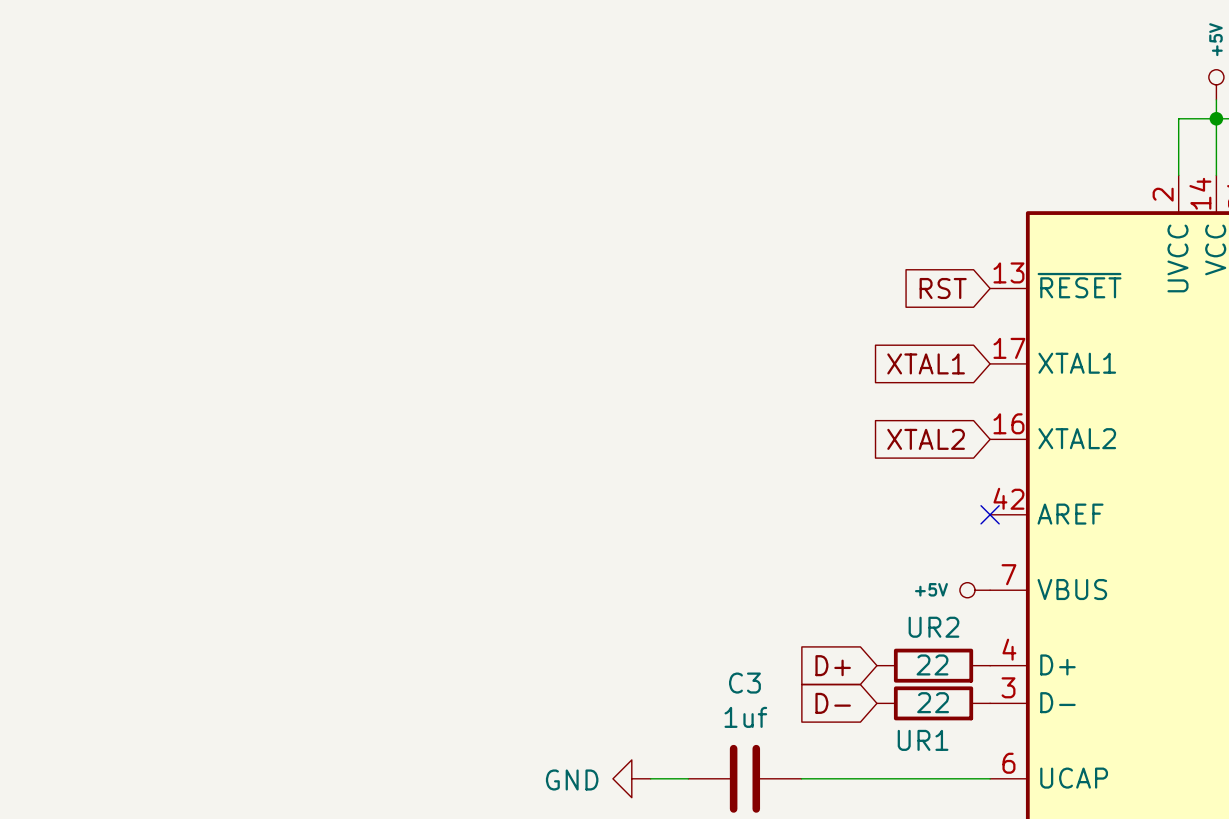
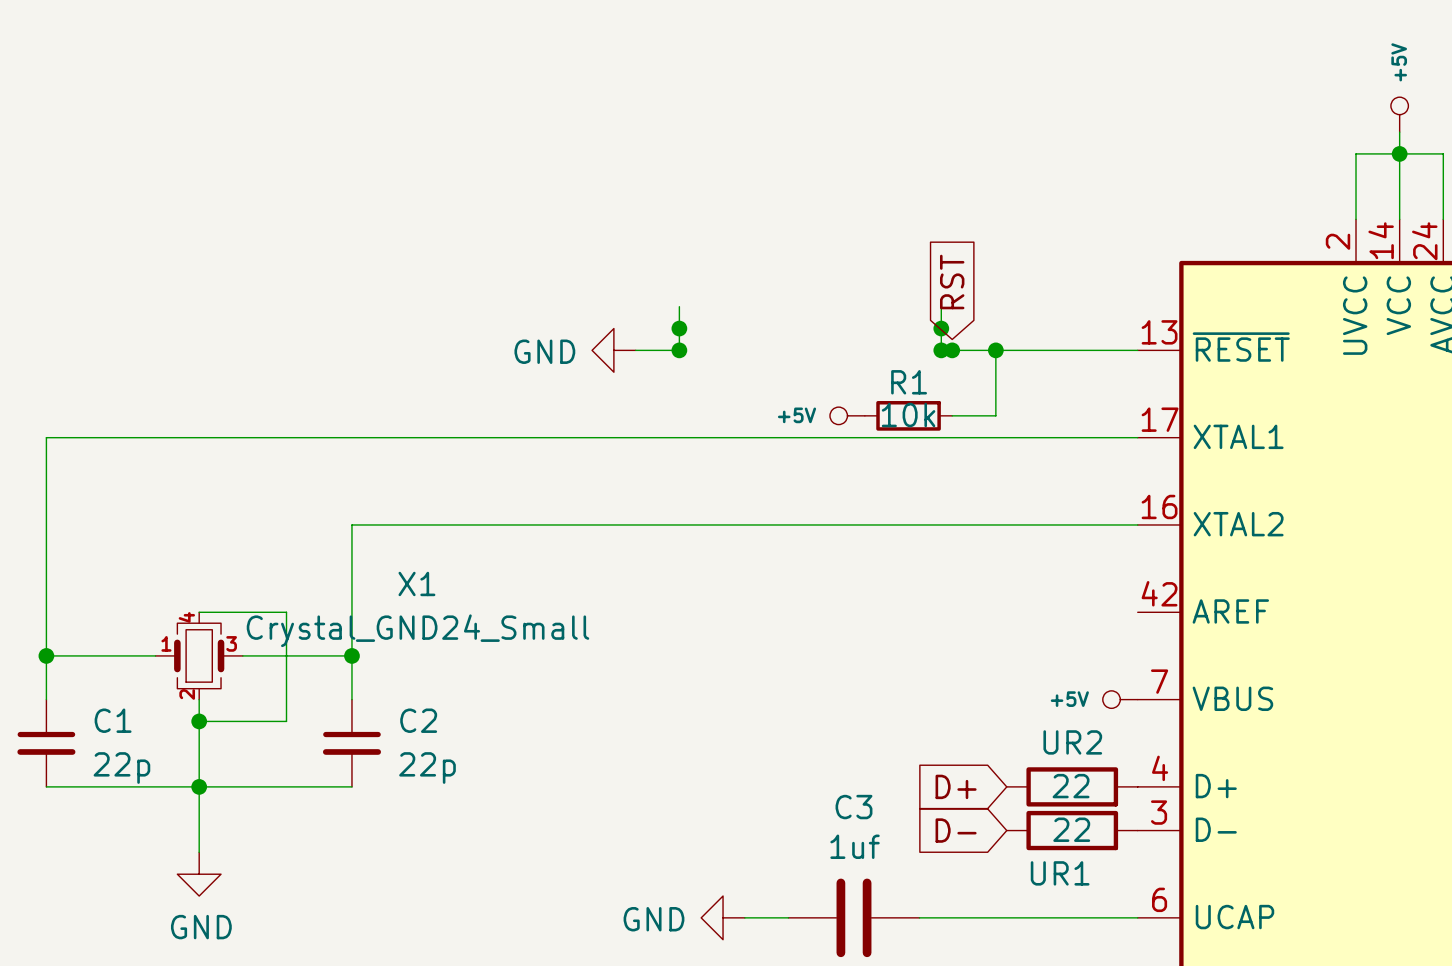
wire: none -> (679, 306) (679, 350) (635, 350)
wire: none -> (941, 306) (941, 350) (1137, 350)
junction: none -> (679, 328)
junction: none -> (941, 328)
power symbol: none -> GND (613, 350)
junction: none -> (679, 350)
junction: none -> (941, 350)
junction: none -> (952, 350)
wire: none -> (995, 350) (995, 415) (952, 415)
junction: none -> (995, 350)
global label rotation: 0° (943, 288) -> 90° clockwise (952, 282)
global label position: RST (943, 288) -> RST (952, 282)
power symbol: none -> +5V (847, 415)
R1: none -> 10k (908, 415)
global label: XTAL1 (926, 363) -> none
wire: none -> (1137, 437) (46, 437) (46, 699)
global label: XTAL2 (926, 439) -> none
wire: none -> (1137, 524) (351, 524) (351, 699)
wire: none -> (199, 612) (286, 612) (286, 721) (199, 721)
no-connect mark: (990, 514) -> none
wire: none -> (46, 655) (155, 655)
junction: none -> (46, 655)
X1: none -> Crystal_GND24_Small (199, 655)
wire: none -> (242, 655) (351, 655)
junction: none -> (351, 655)
wire: none -> (199, 699) (199, 852)
junction: none -> (199, 721)
C1: none -> 22p (46, 743)
C2: none -> 22p (351, 743)
wire: none -> (46, 786) (351, 786)
junction: none -> (199, 786)
power symbol: none -> GND (199, 874)

